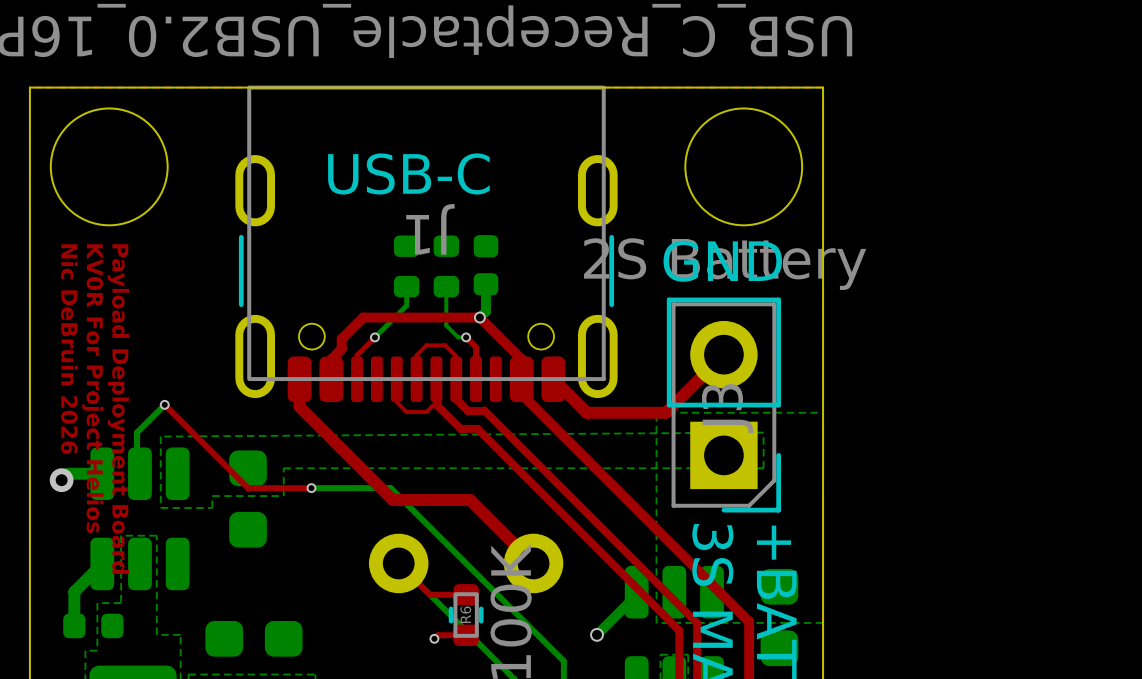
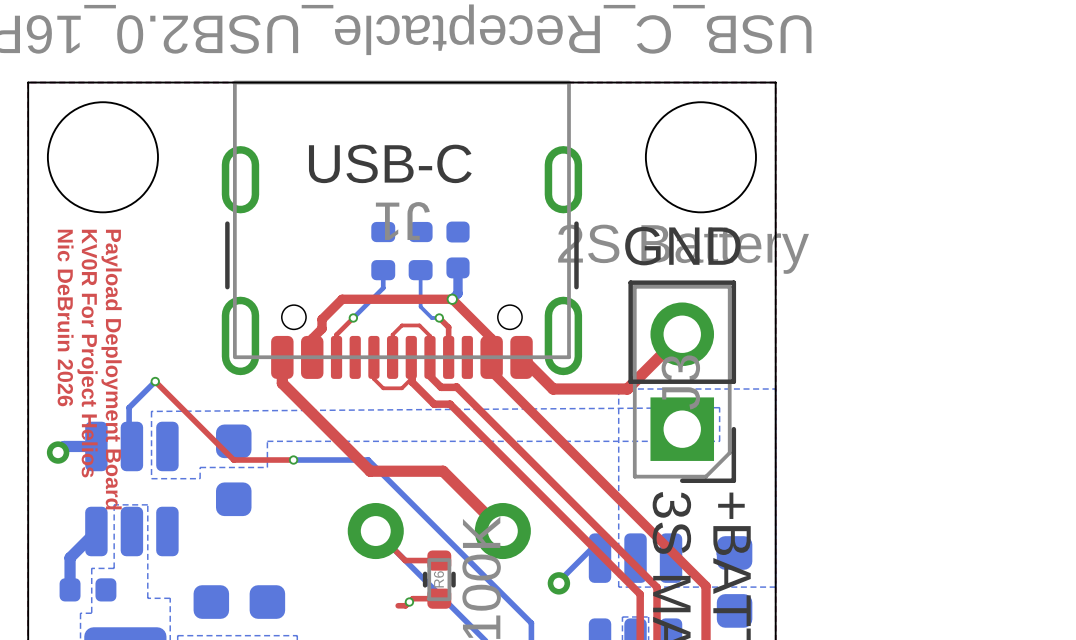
bottom track: none -> (601, 538) (558, 583)
bottom track: (636, 592) (636, 595) (597, 634) -> none
via size: [590, 627, 604, 642] -> [547, 572, 571, 595]
top track: none -> (409, 602) (405, 605) (398, 605)

